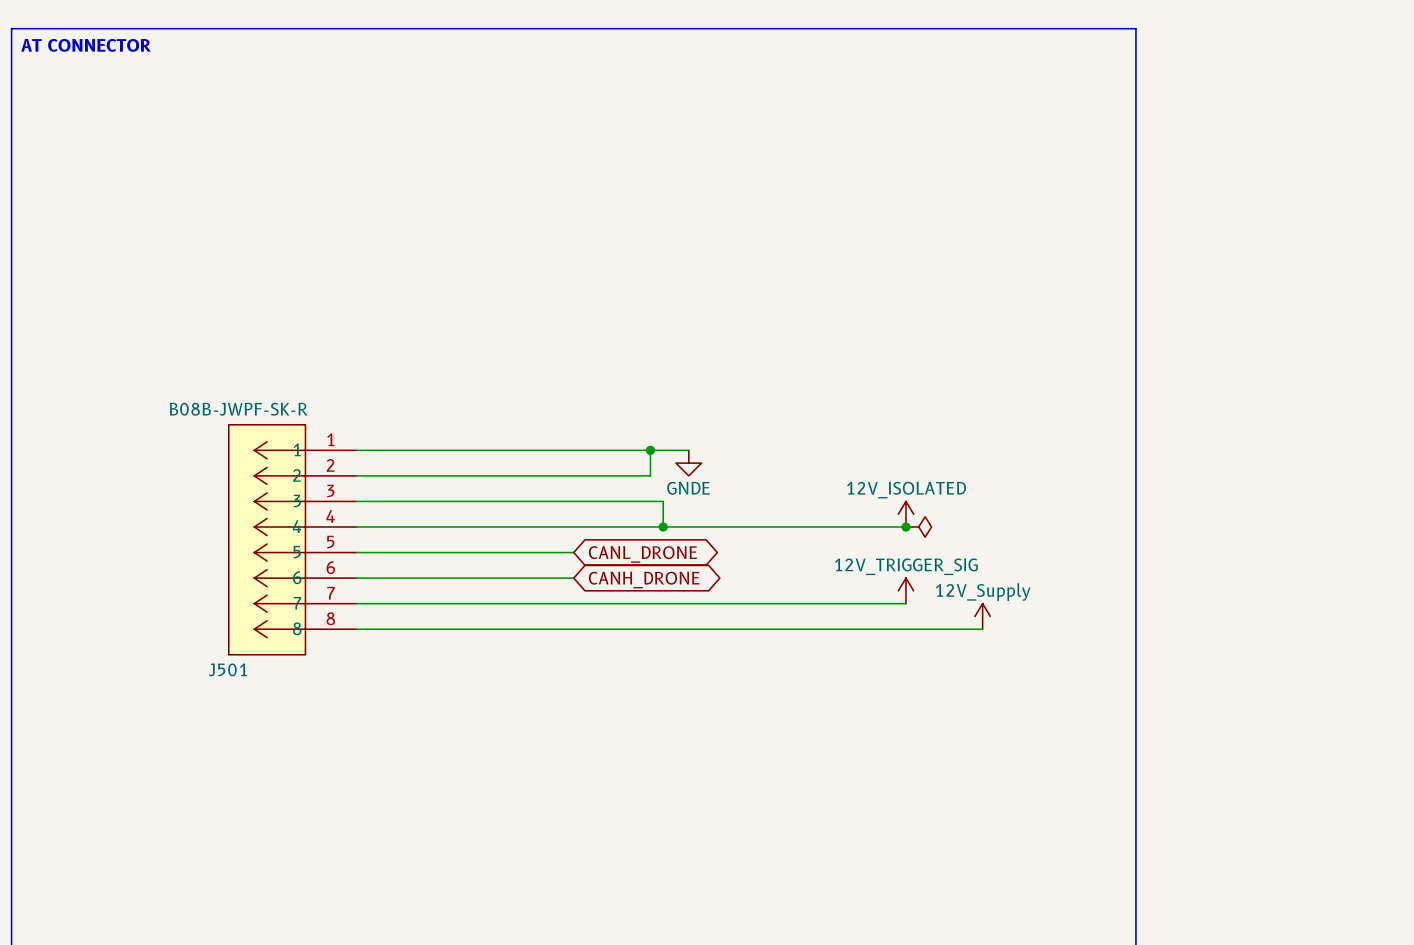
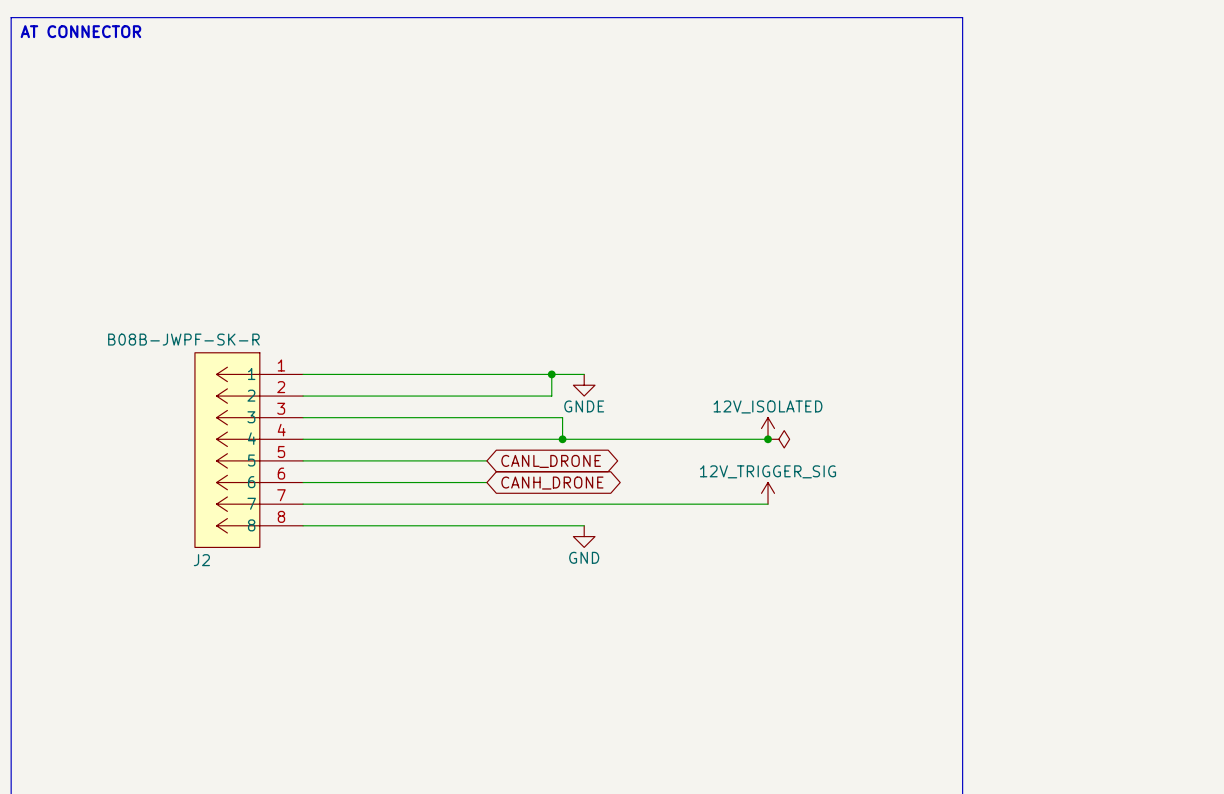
power symbol: 12V_Supply (982, 616) -> none
wire: (688, 629) (982, 629) -> none
power symbol: none -> GND (584, 536)
J501 name: J501 (228, 669) -> J2 (201, 560)

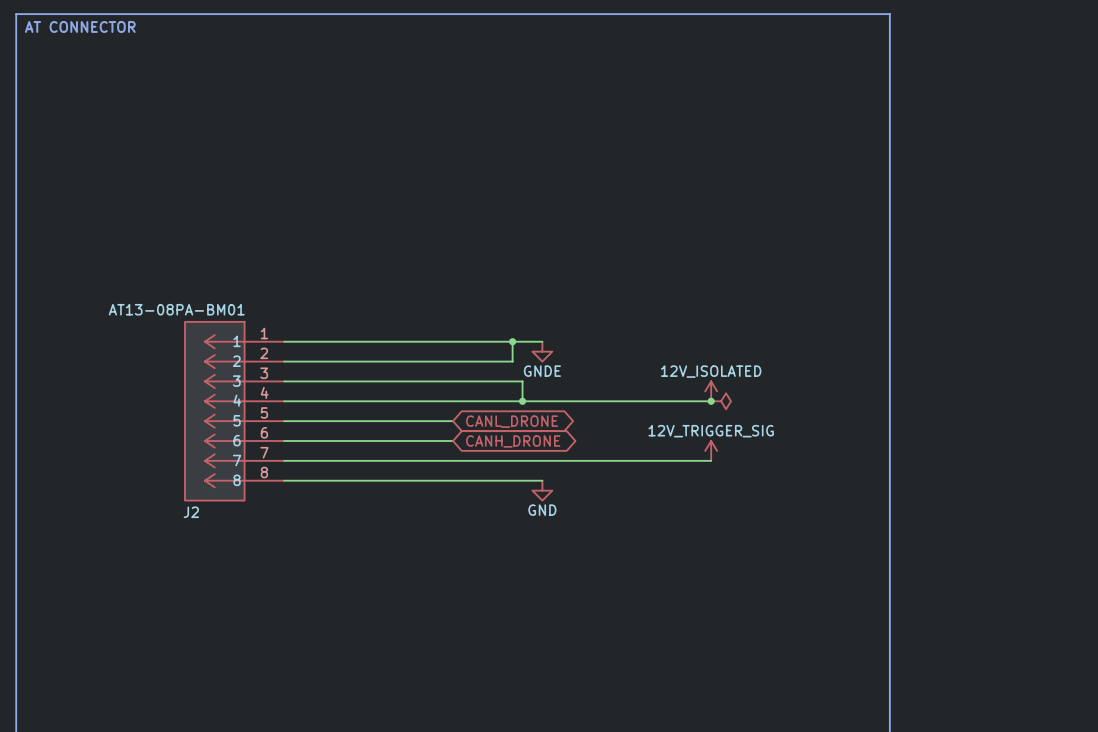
J2 value: B08B-JWPF-SK-R (183, 339) -> AT13-08PA-BM01 (176, 309)

